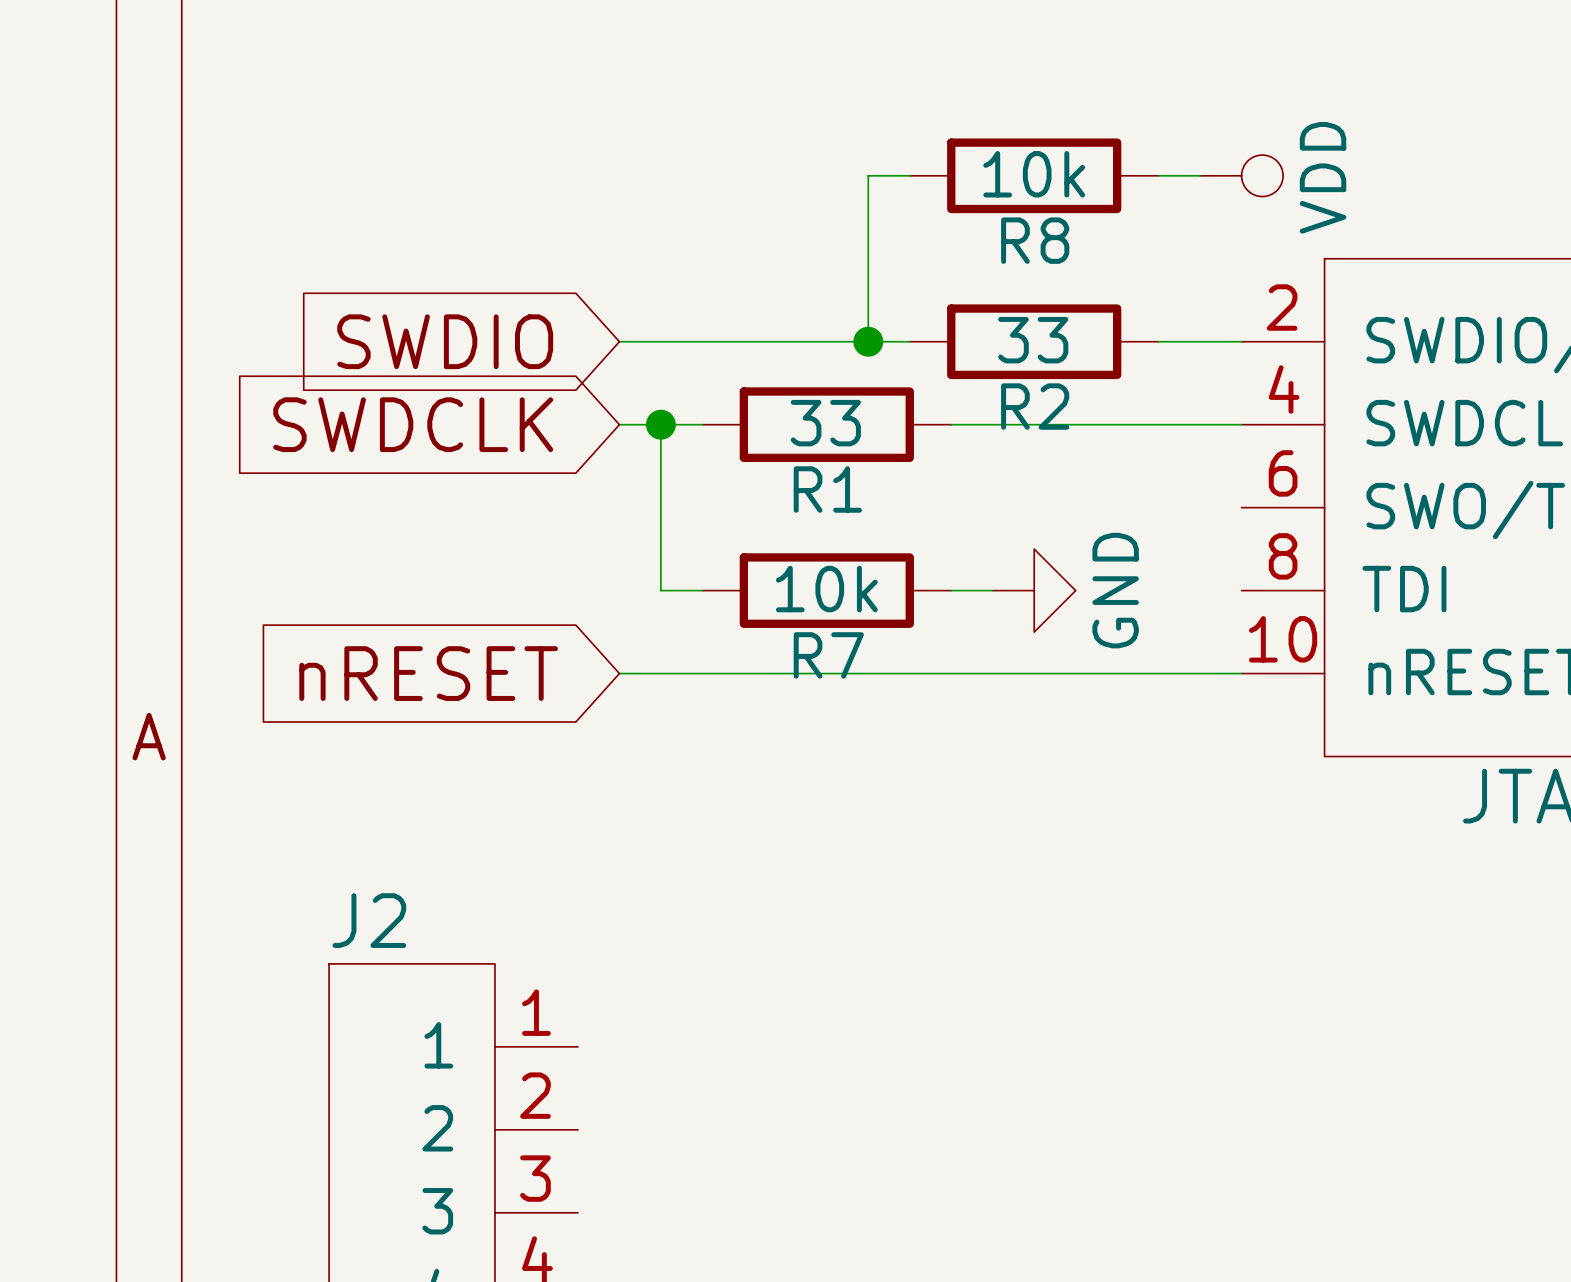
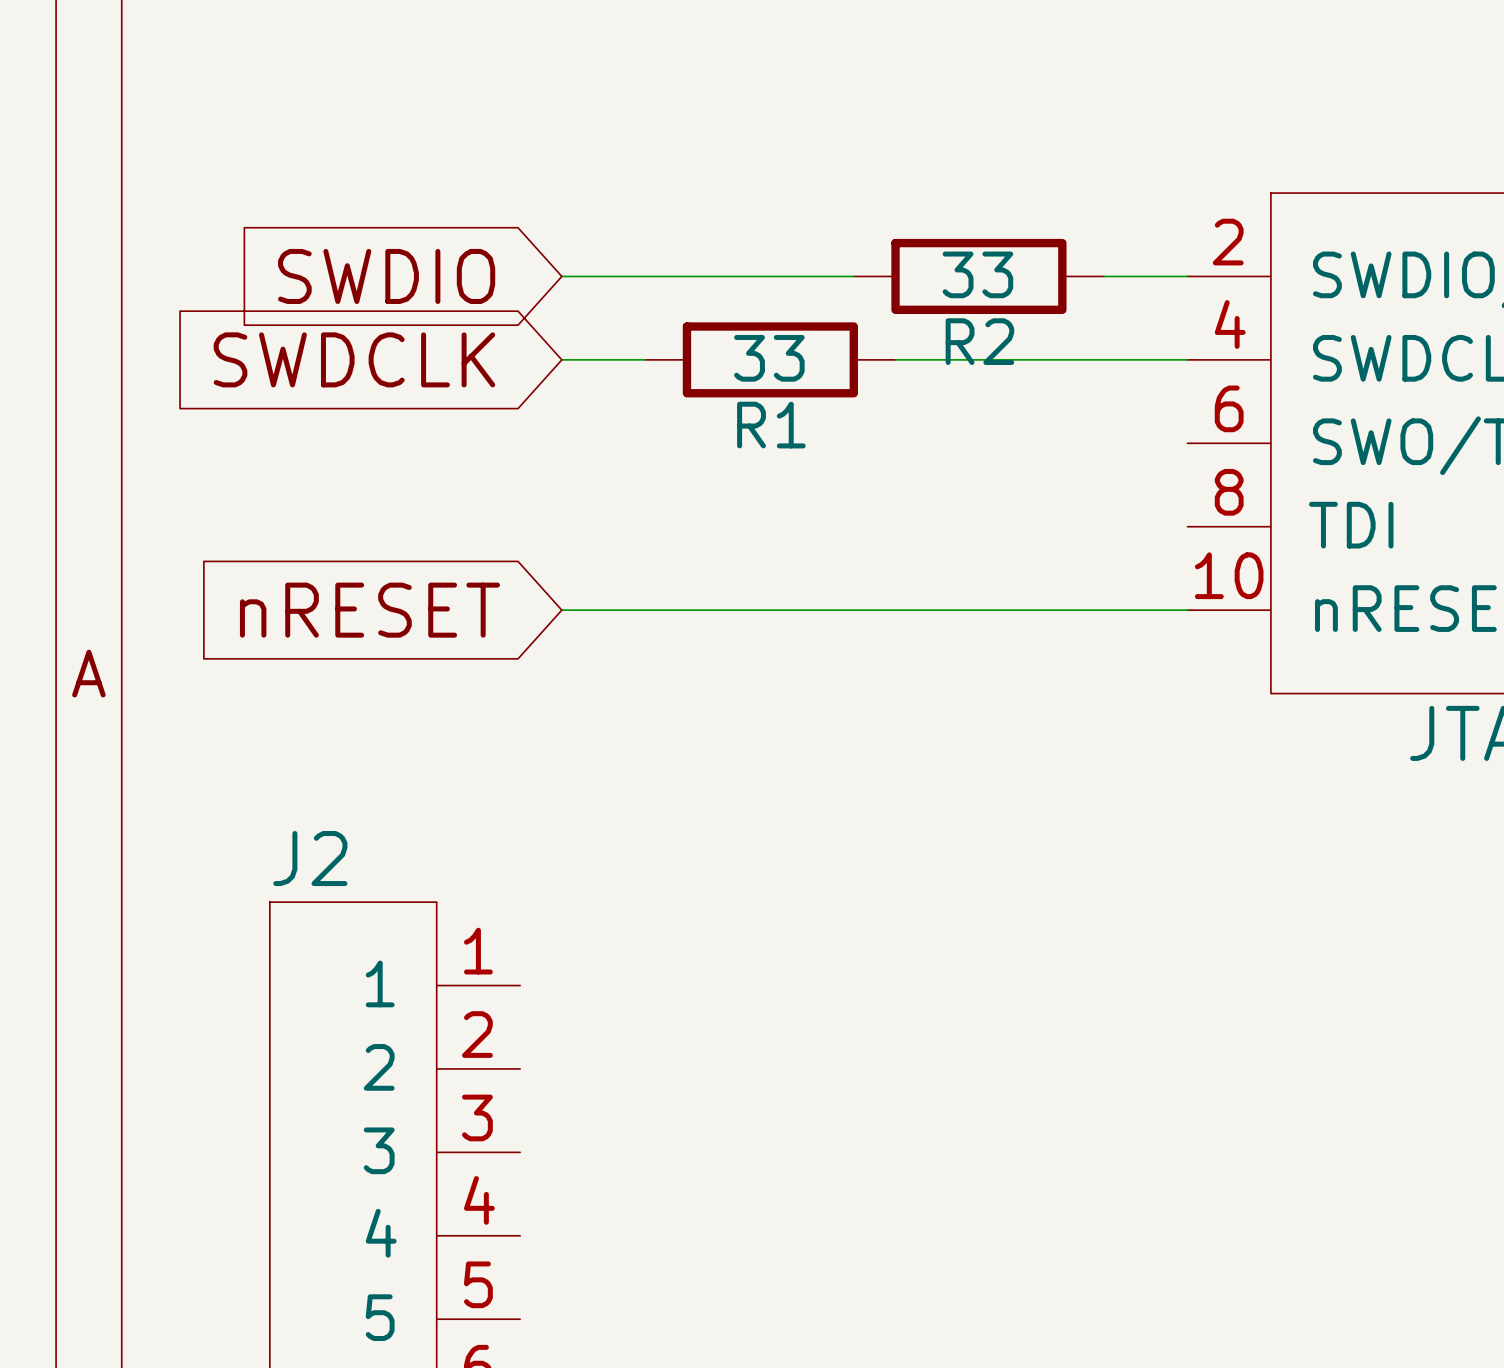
wire: (909, 175) (868, 175) (868, 341) -> none
R8: 10k (1034, 175) -> none
wire: (1158, 175) (1200, 175) -> none
power symbol: VDD (1241, 175) -> none
junction: (868, 341) -> none
wire: (660, 424) (660, 590) (702, 590) -> none
junction: (660, 424) -> none
R7: 10k (826, 590) -> none
wire: (951, 590) (992, 590) -> none
power symbol: GND (1034, 590) -> none

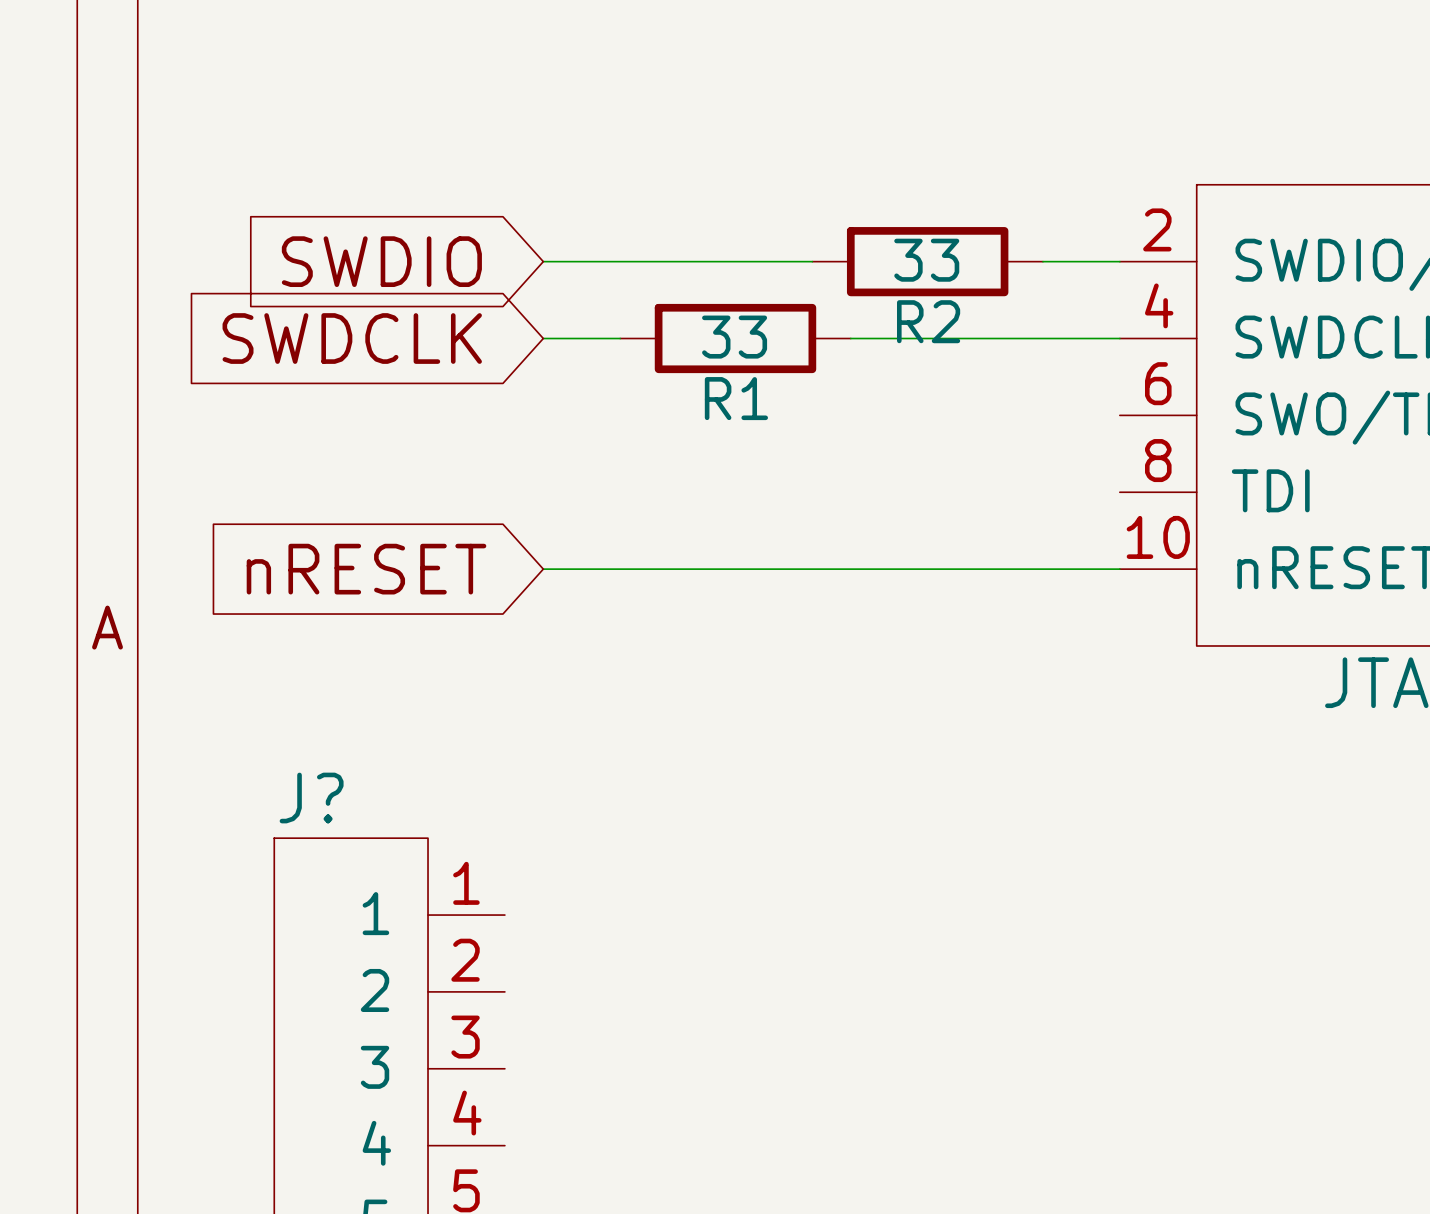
J2 name: J2 (310, 858) -> J? (311, 798)

